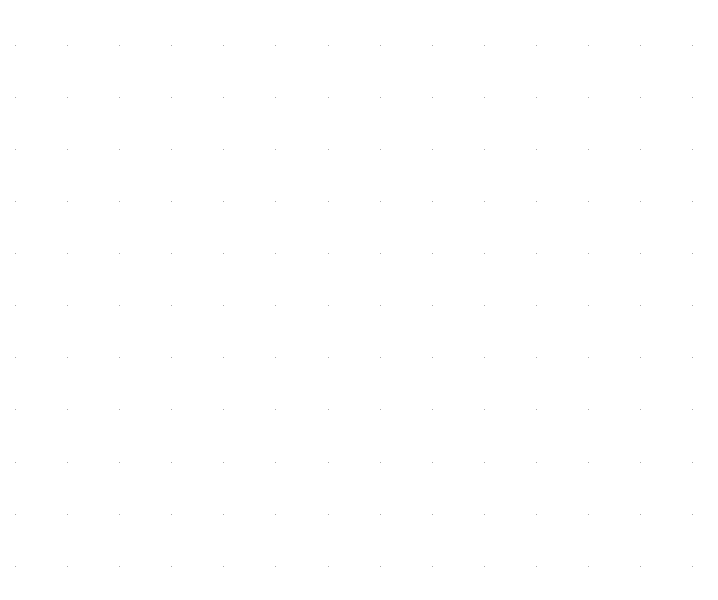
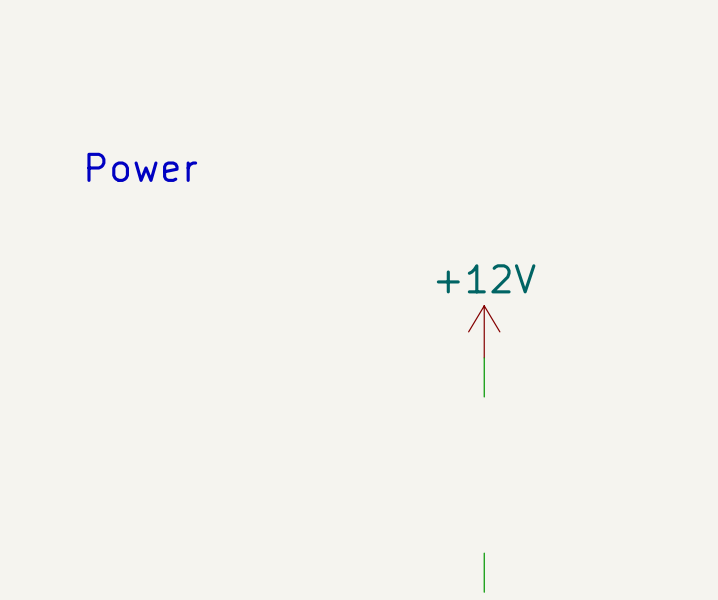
text: none -> Power (142, 167)
power symbol: none -> +12V (484, 331)
wire: none -> (484, 357) (484, 396)
wire: none -> (484, 553) (484, 592)

